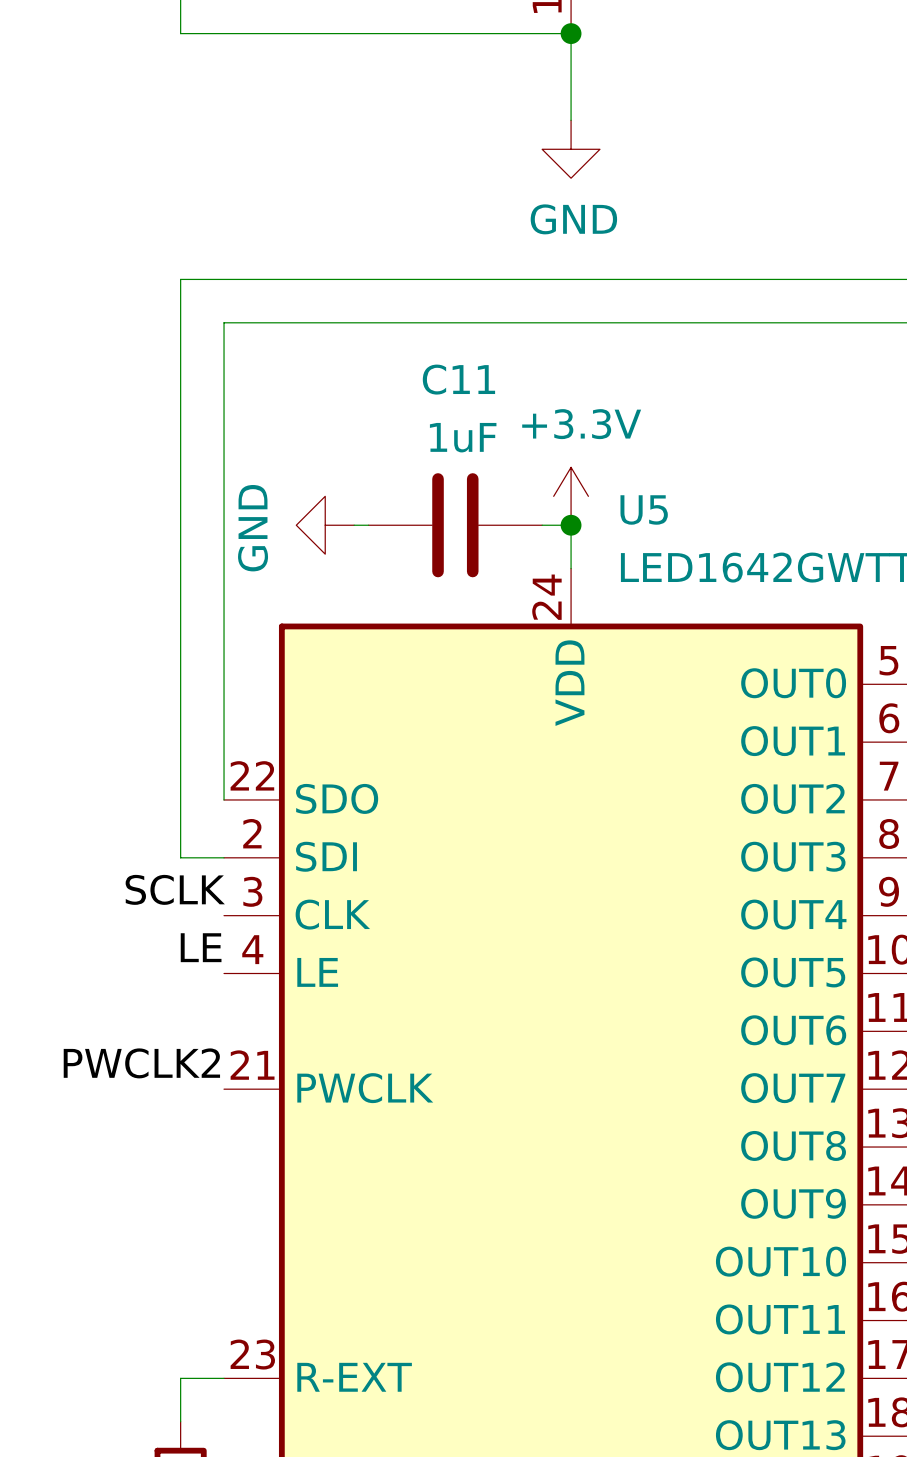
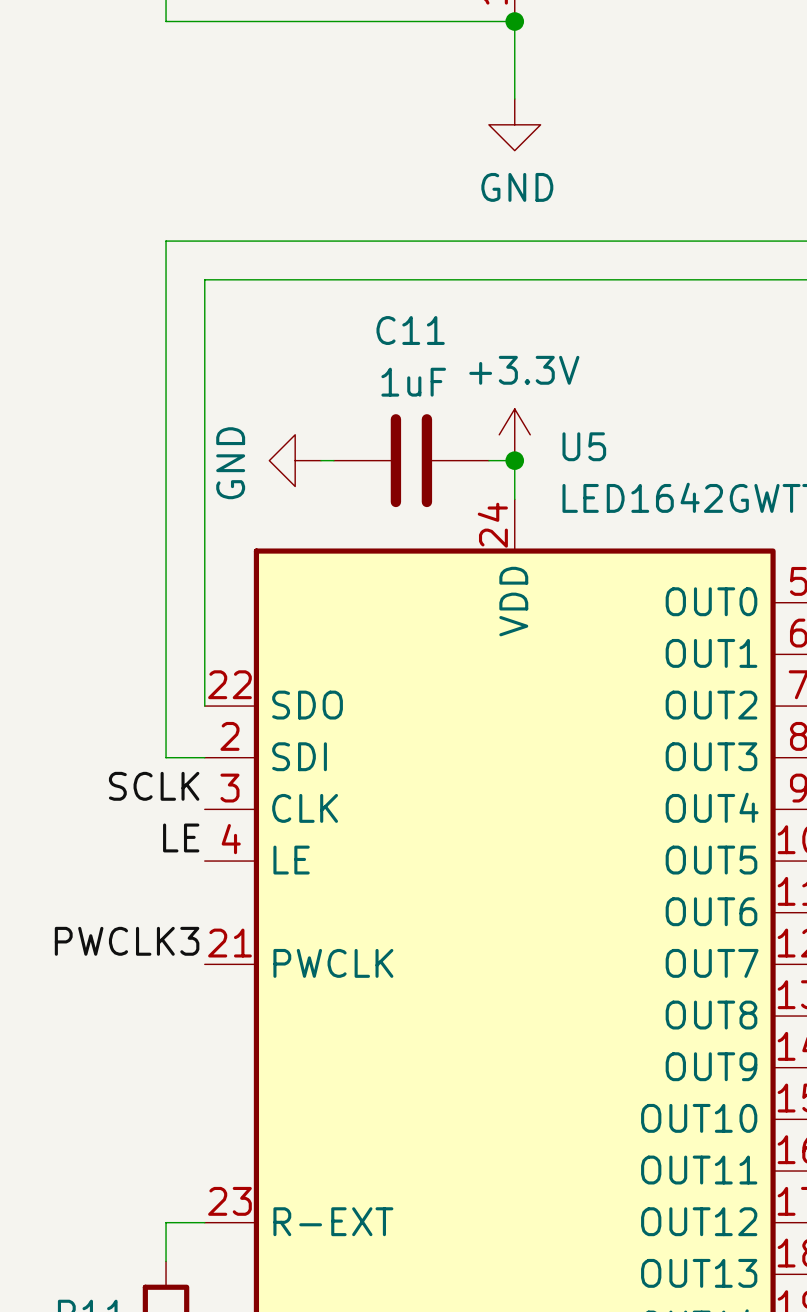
label: PWCLK2 (141, 1063) -> PWCLK3 (127, 941)

